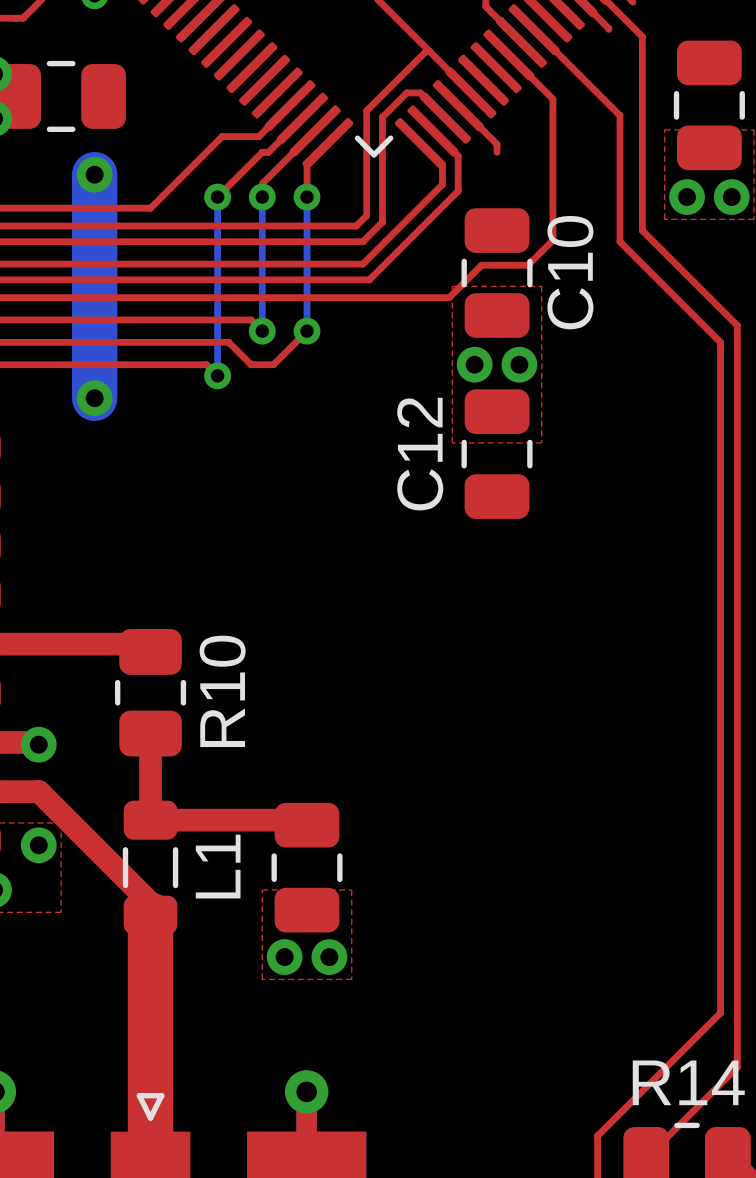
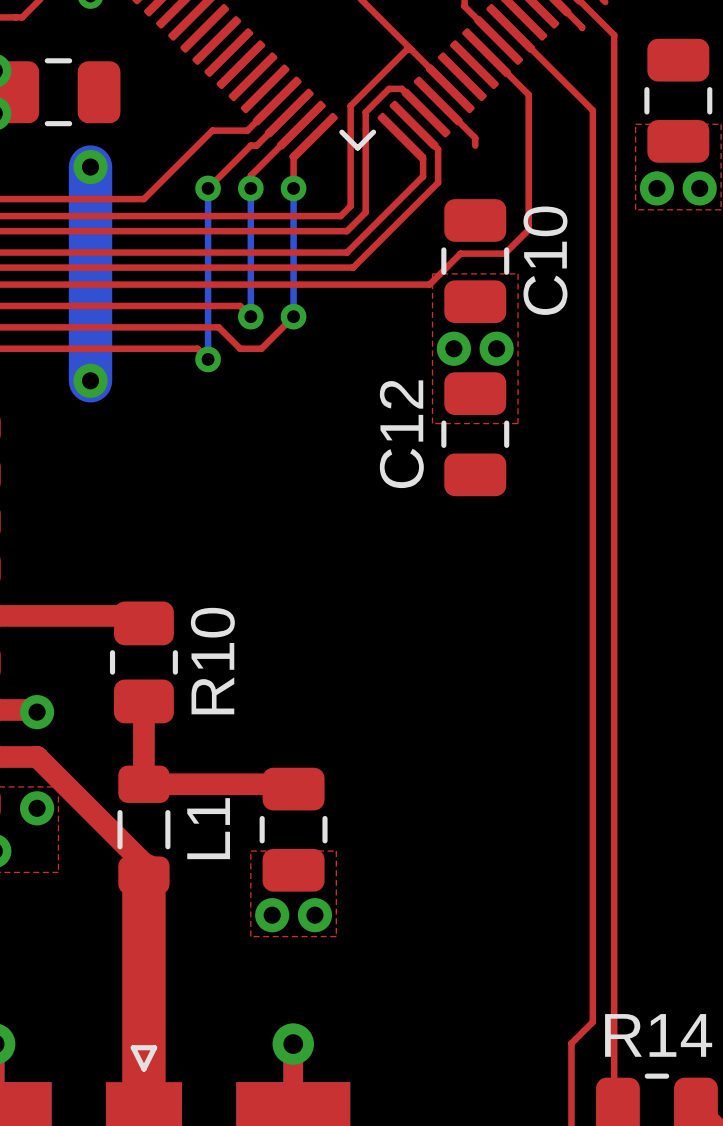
top track: (642, 230) (737, 325) (737, 1067) (646, 1158) -> (614, 220) (614, 1103)
top track: (619, 241) (720, 342) (720, 1012) (597, 1135) -> (592, 231) (592, 1022) (571, 1043) (571, 1086)

